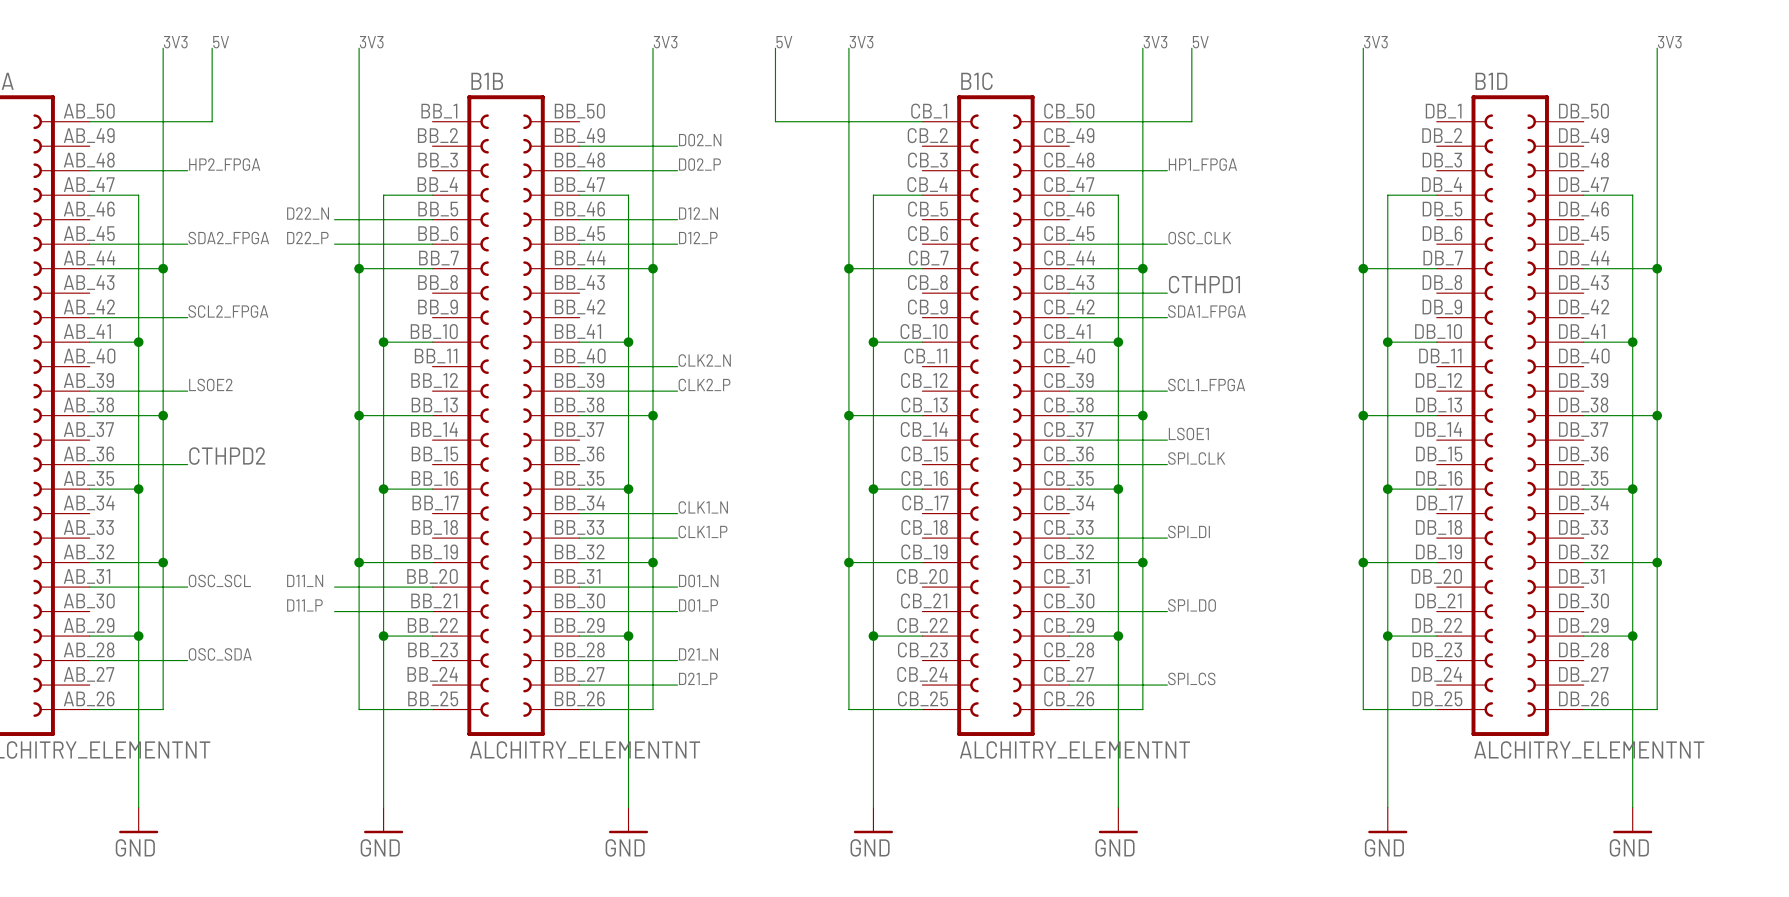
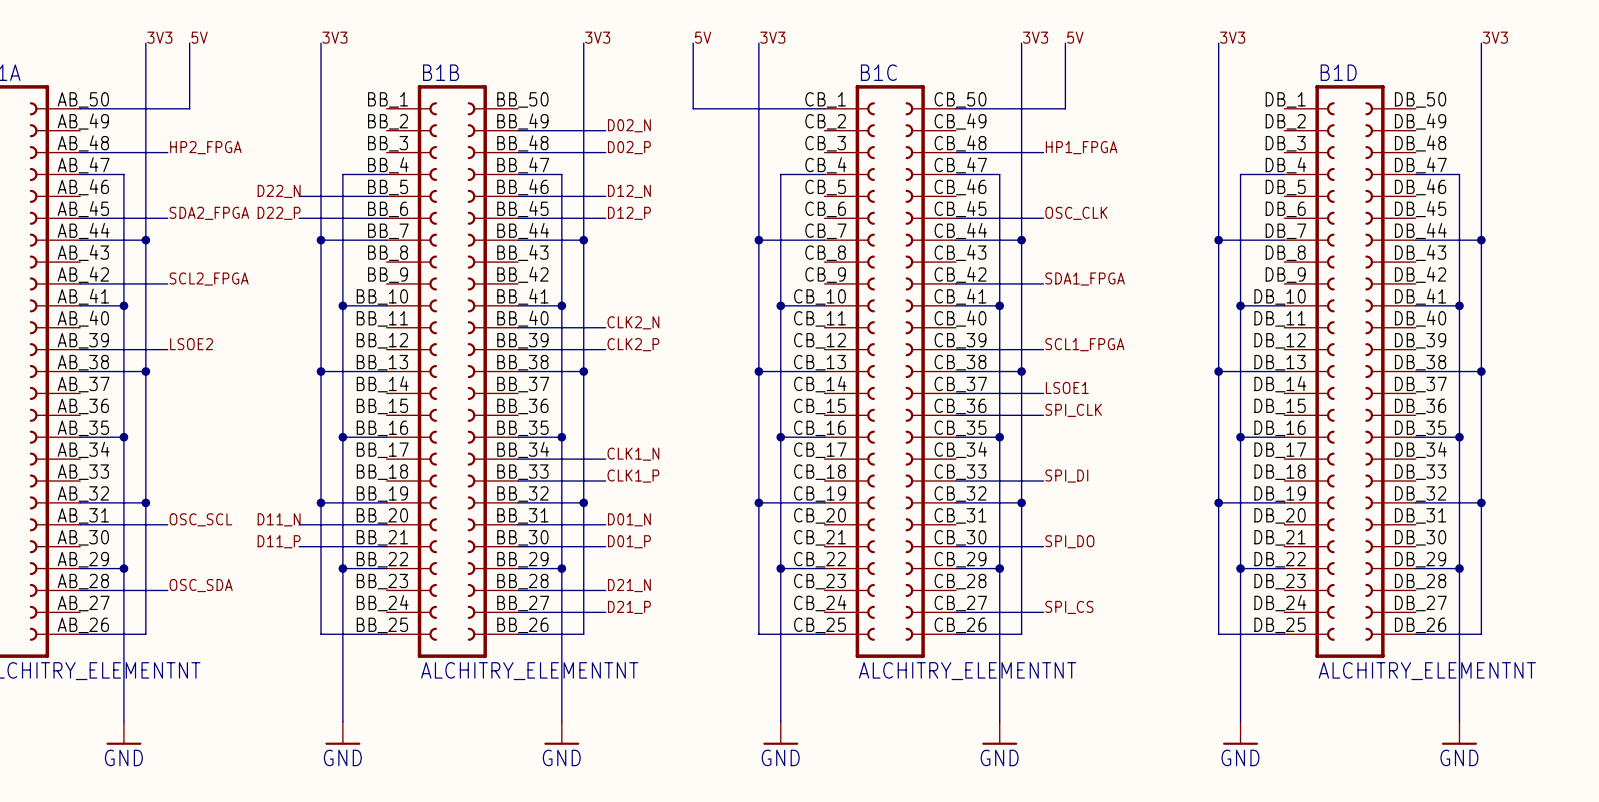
label: CTHPD1 (1204, 284) -> none
wire: (1069, 293) (1167, 293) -> none
label: CTHPD2 (227, 456) -> none
wire: (89, 464) (187, 464) -> none

